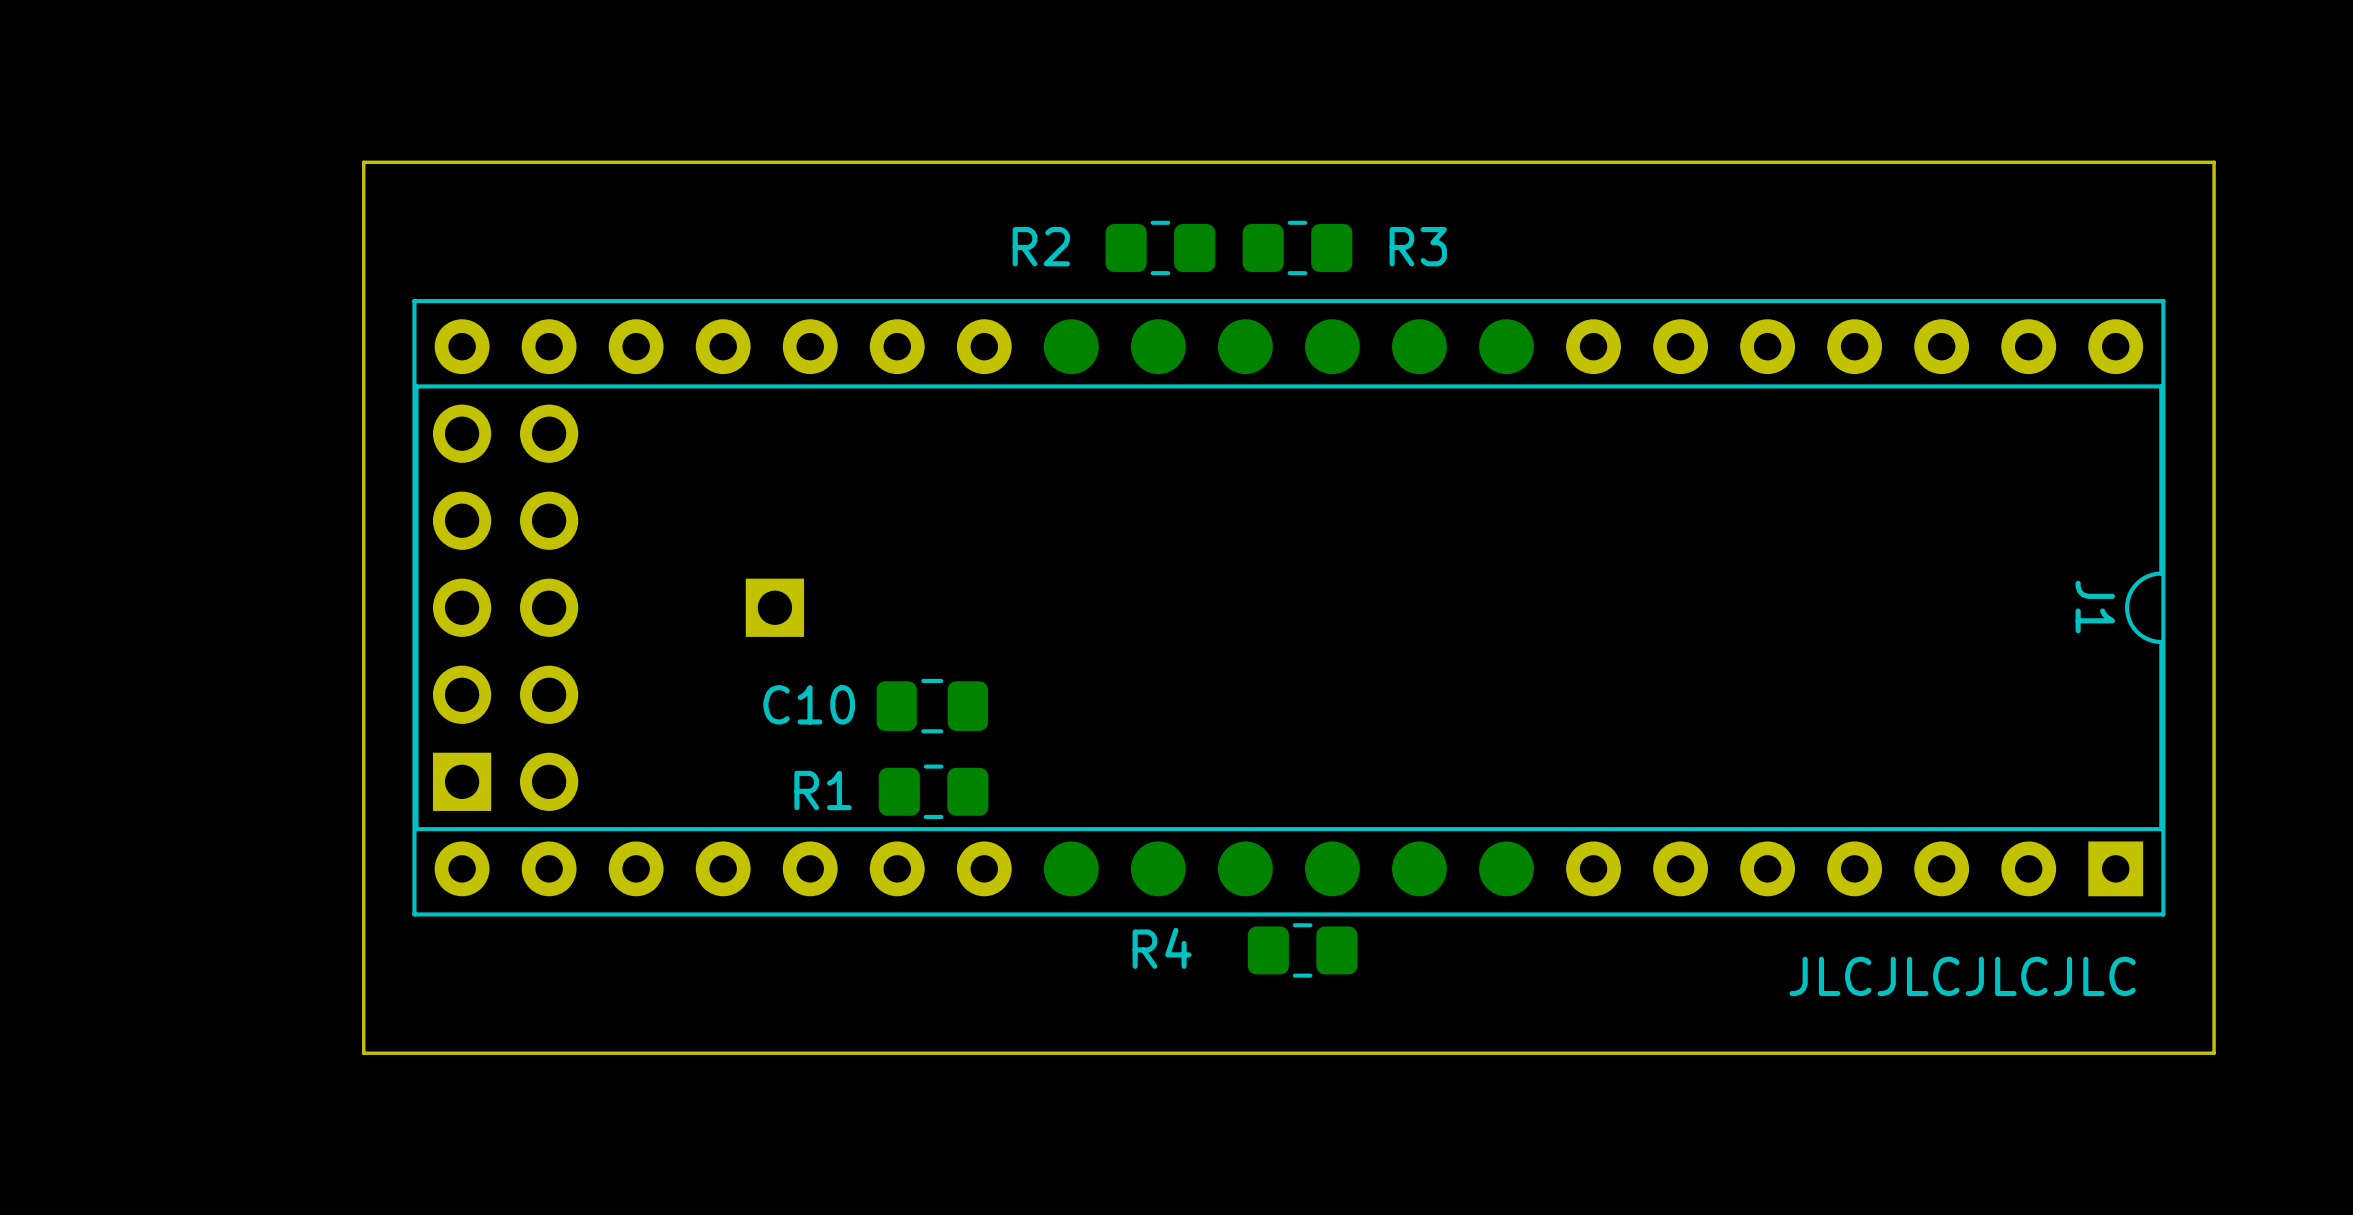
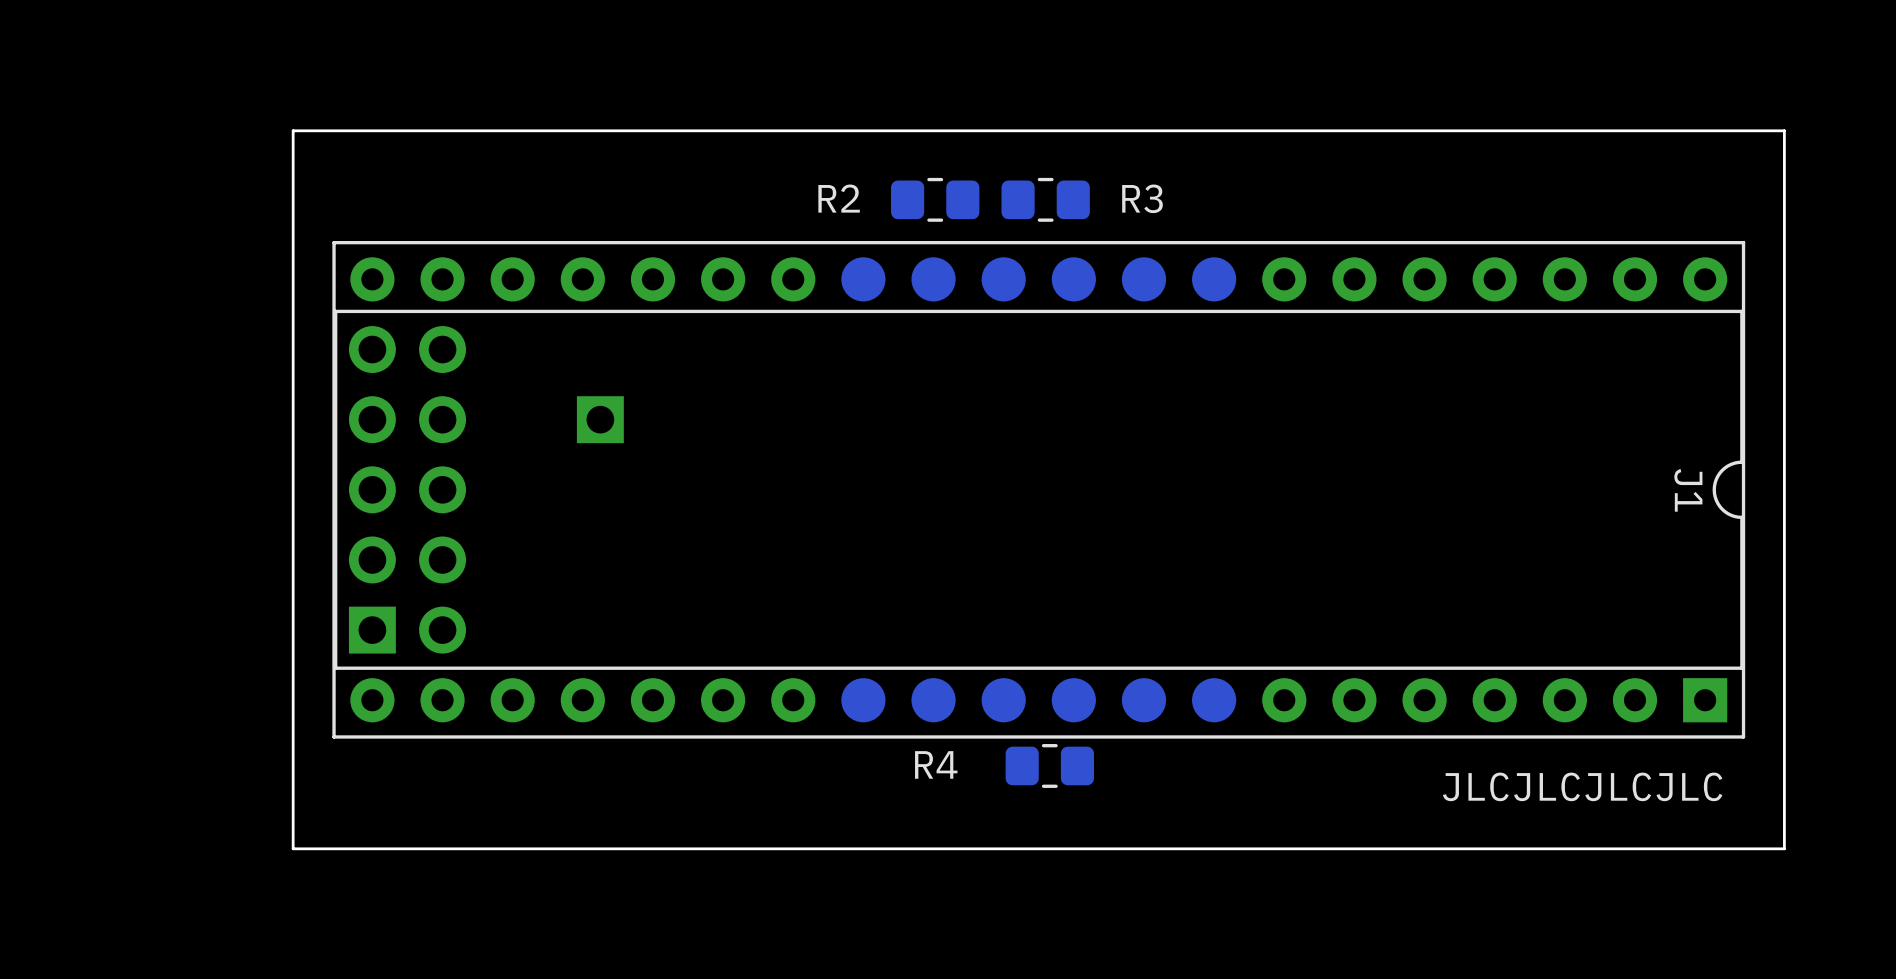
part position: (774, 607) -> (600, 419)
C10: (932, 706) -> none
R1: (933, 791) -> none

